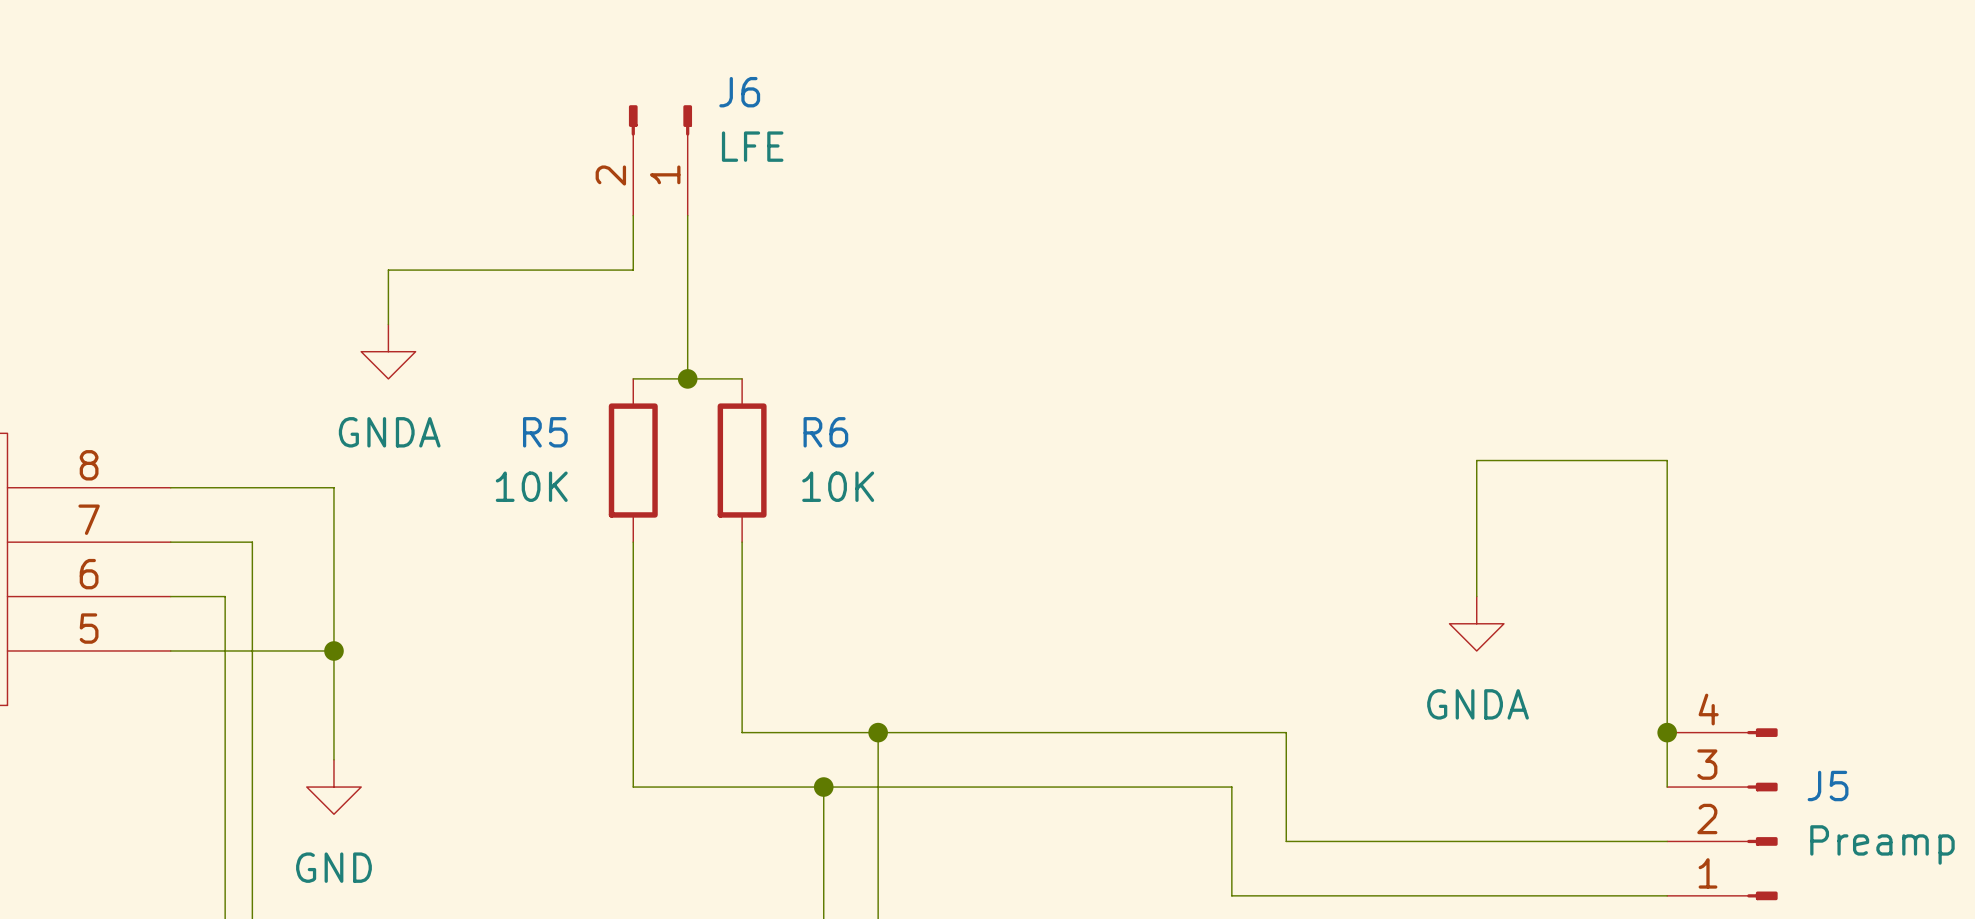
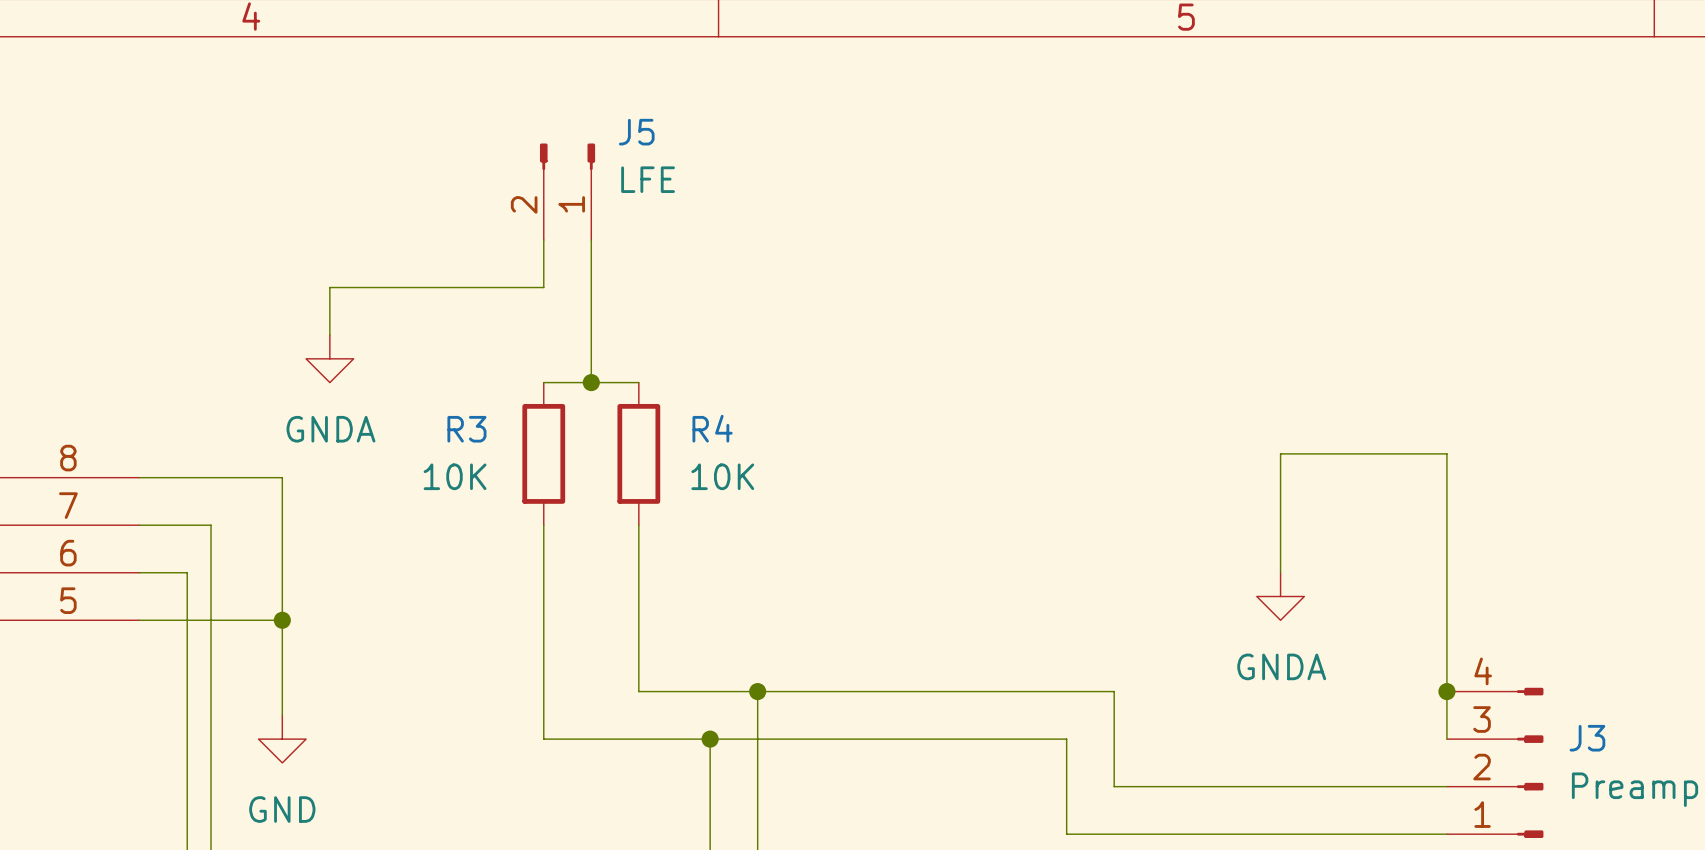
J6 name: J6 (739, 92) -> J5 (636, 132)
R5 name: R5 (545, 432) -> R3 (466, 429)
R6 name: R6 (825, 432) -> R4 (712, 428)
J5 name: J5 (1828, 786) -> J3 (1587, 738)

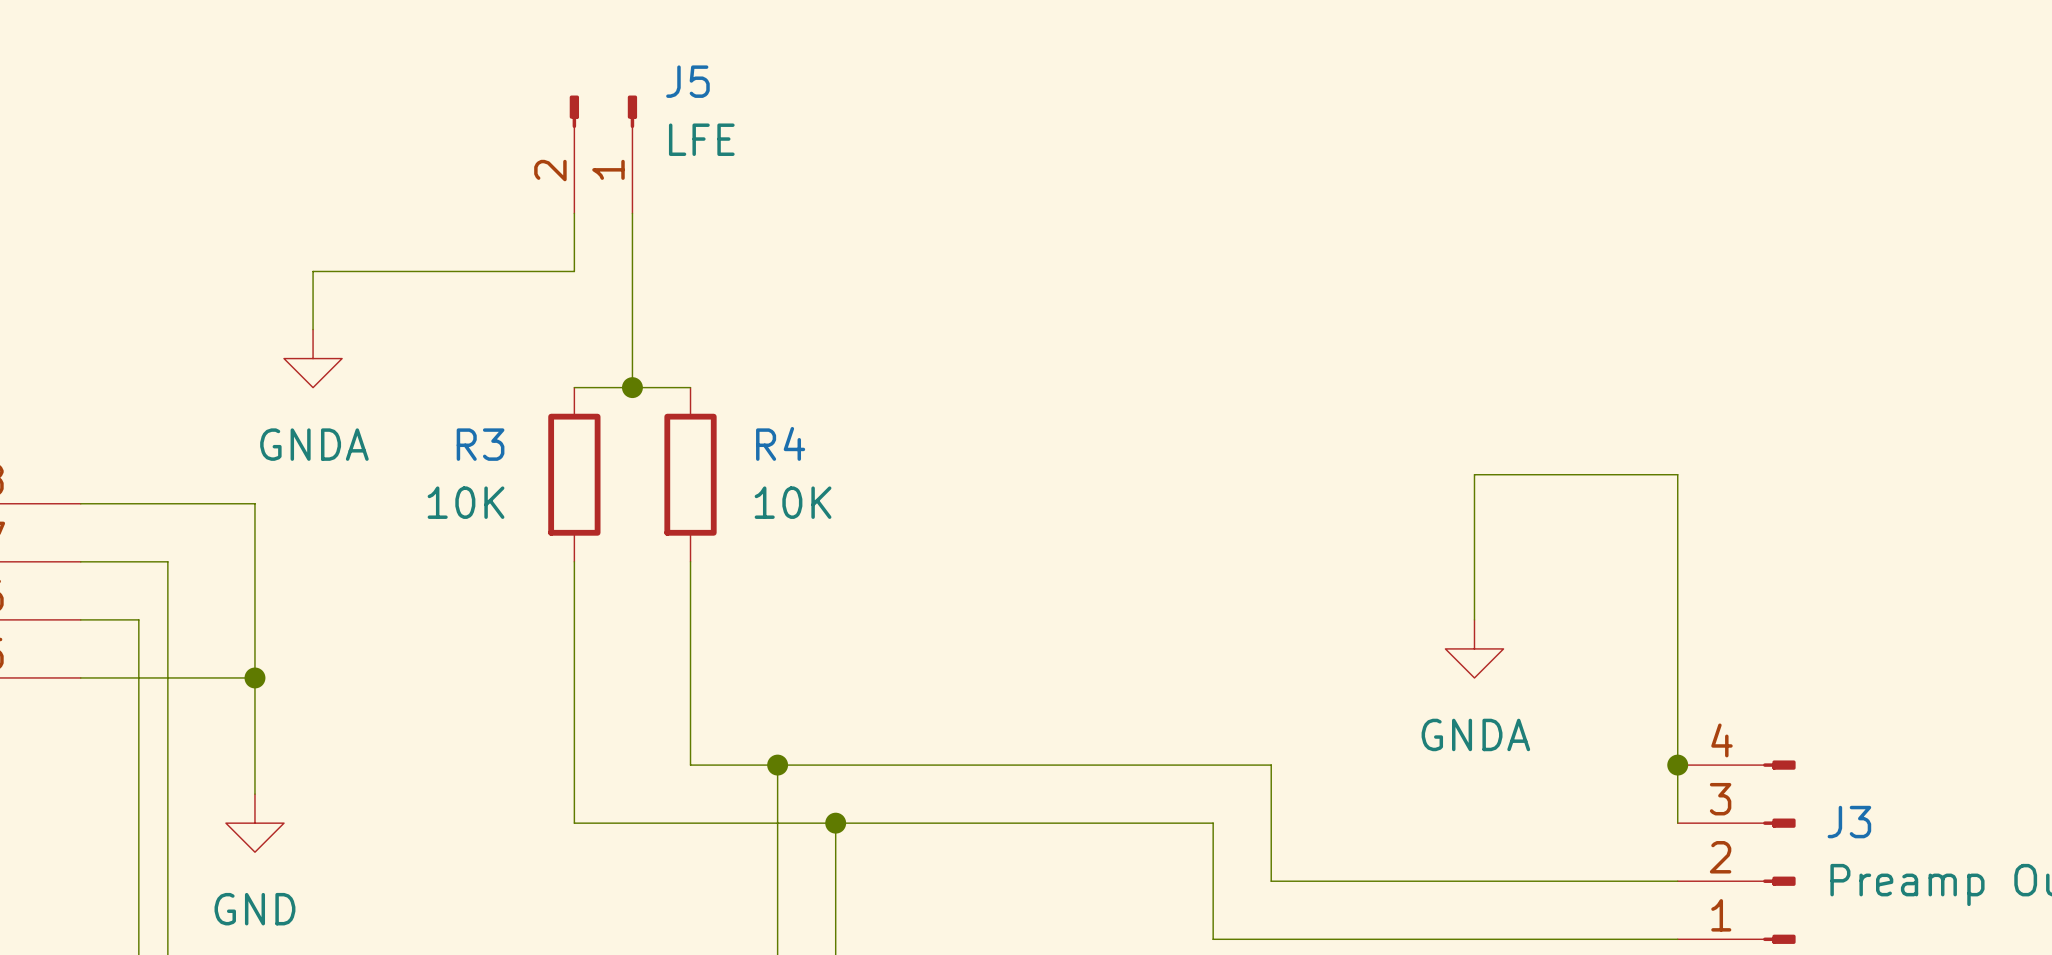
junction: none -> (777, 765)
wire: (757, 691) (757, 739) -> (777, 765) (777, 823)
junction: (757, 691) -> none
junction: (710, 739) -> none
junction: none -> (835, 823)

